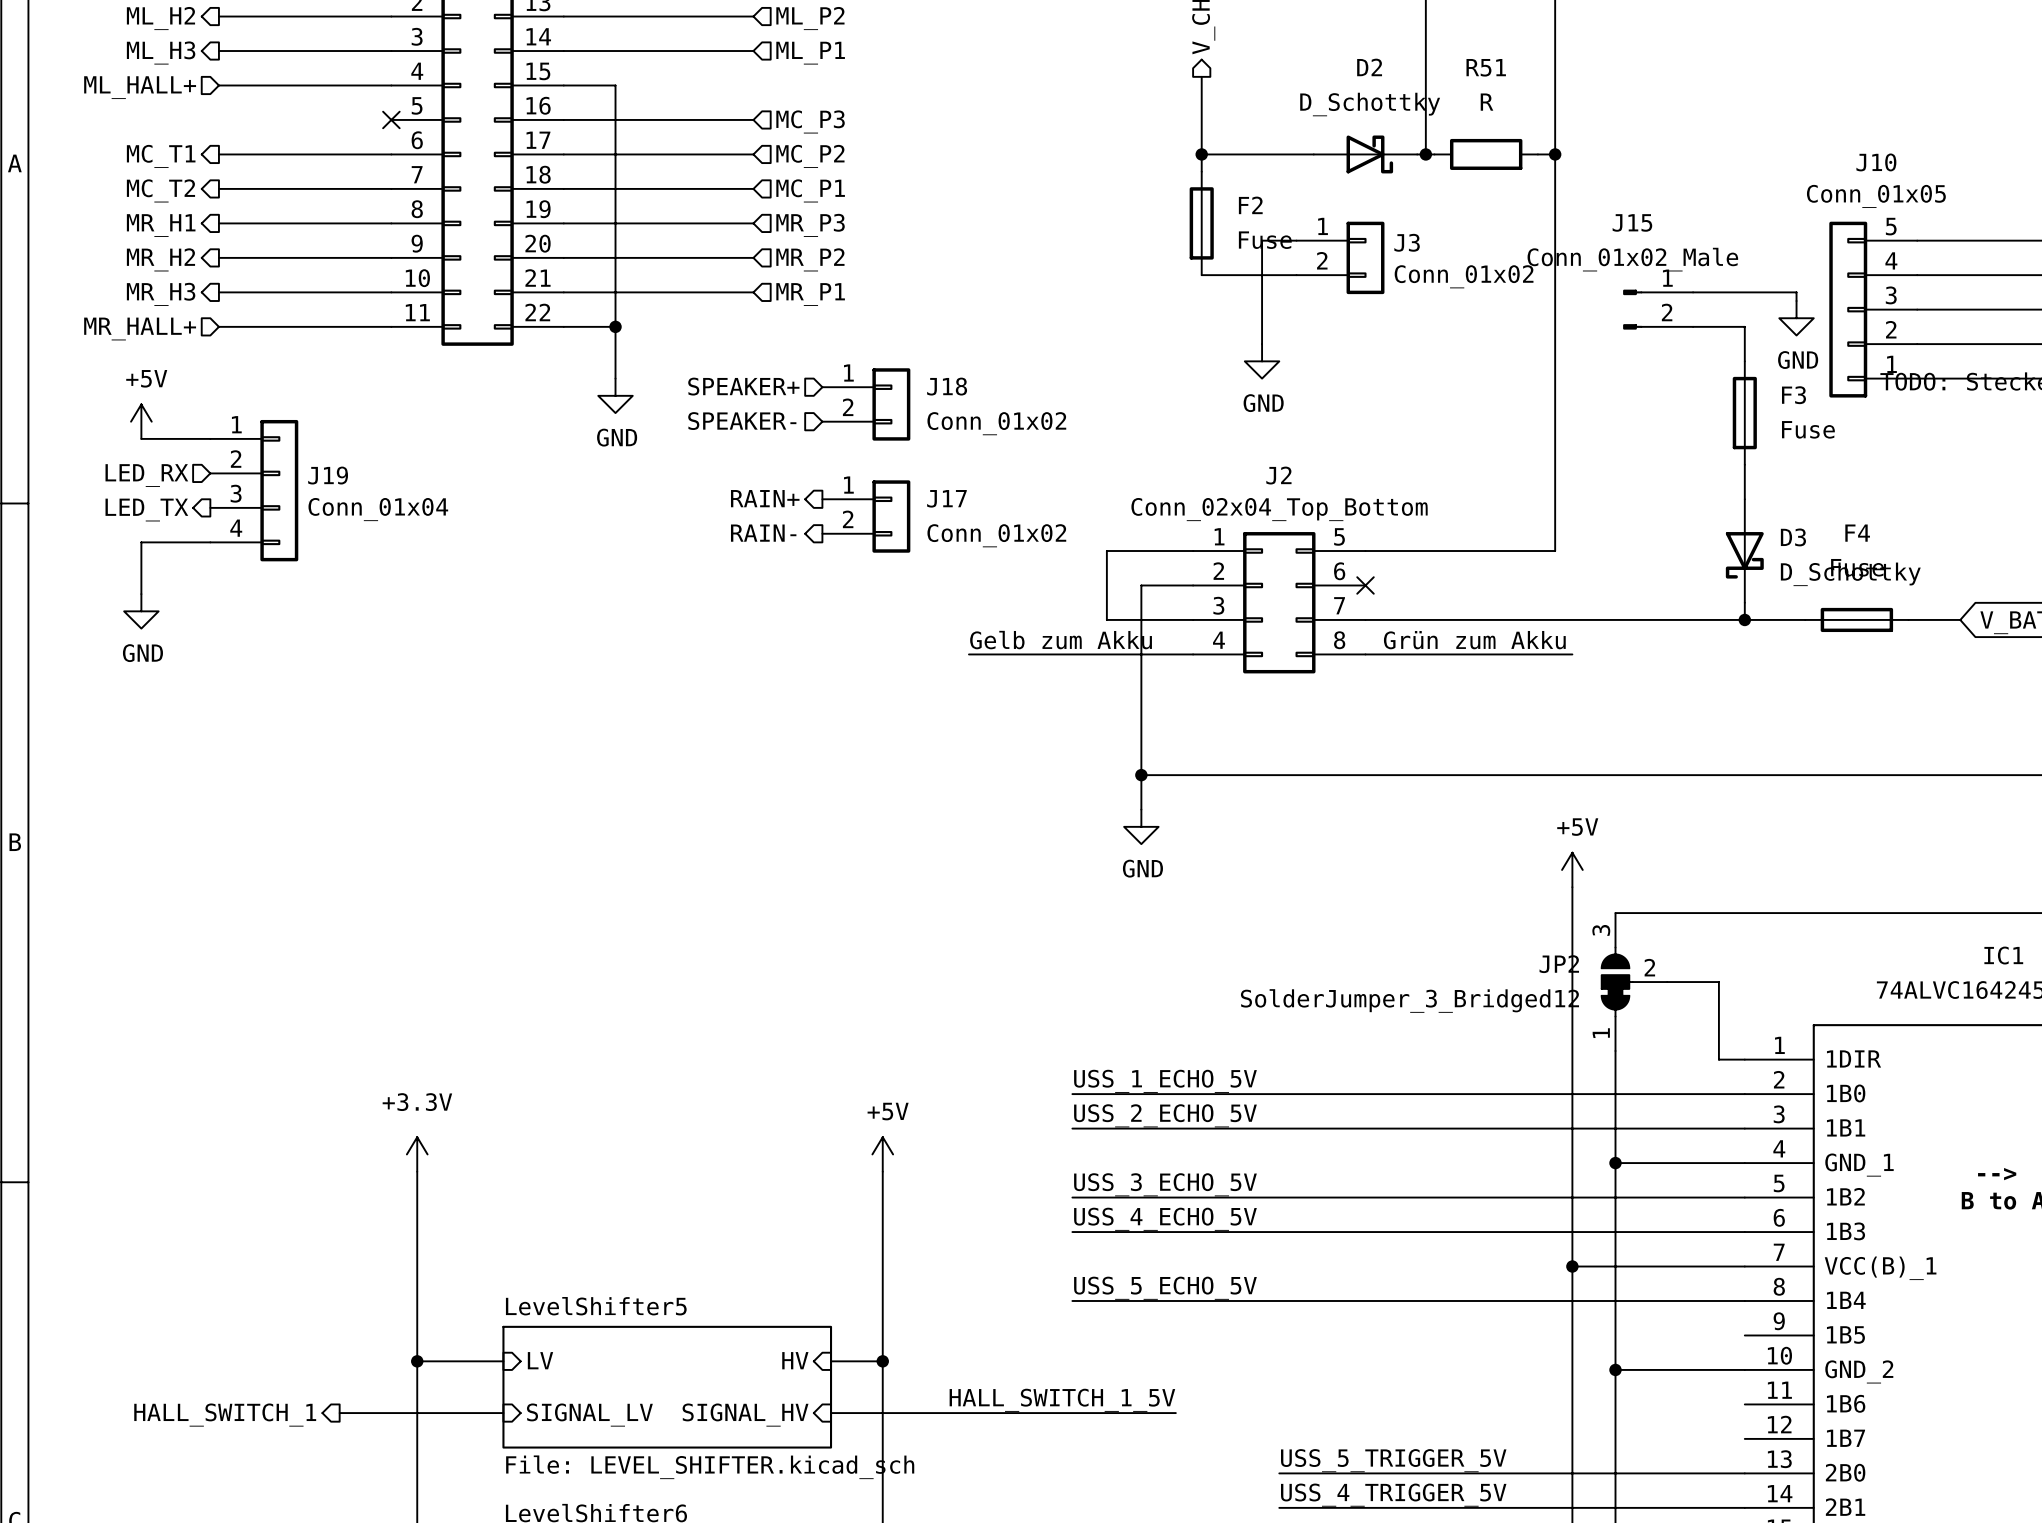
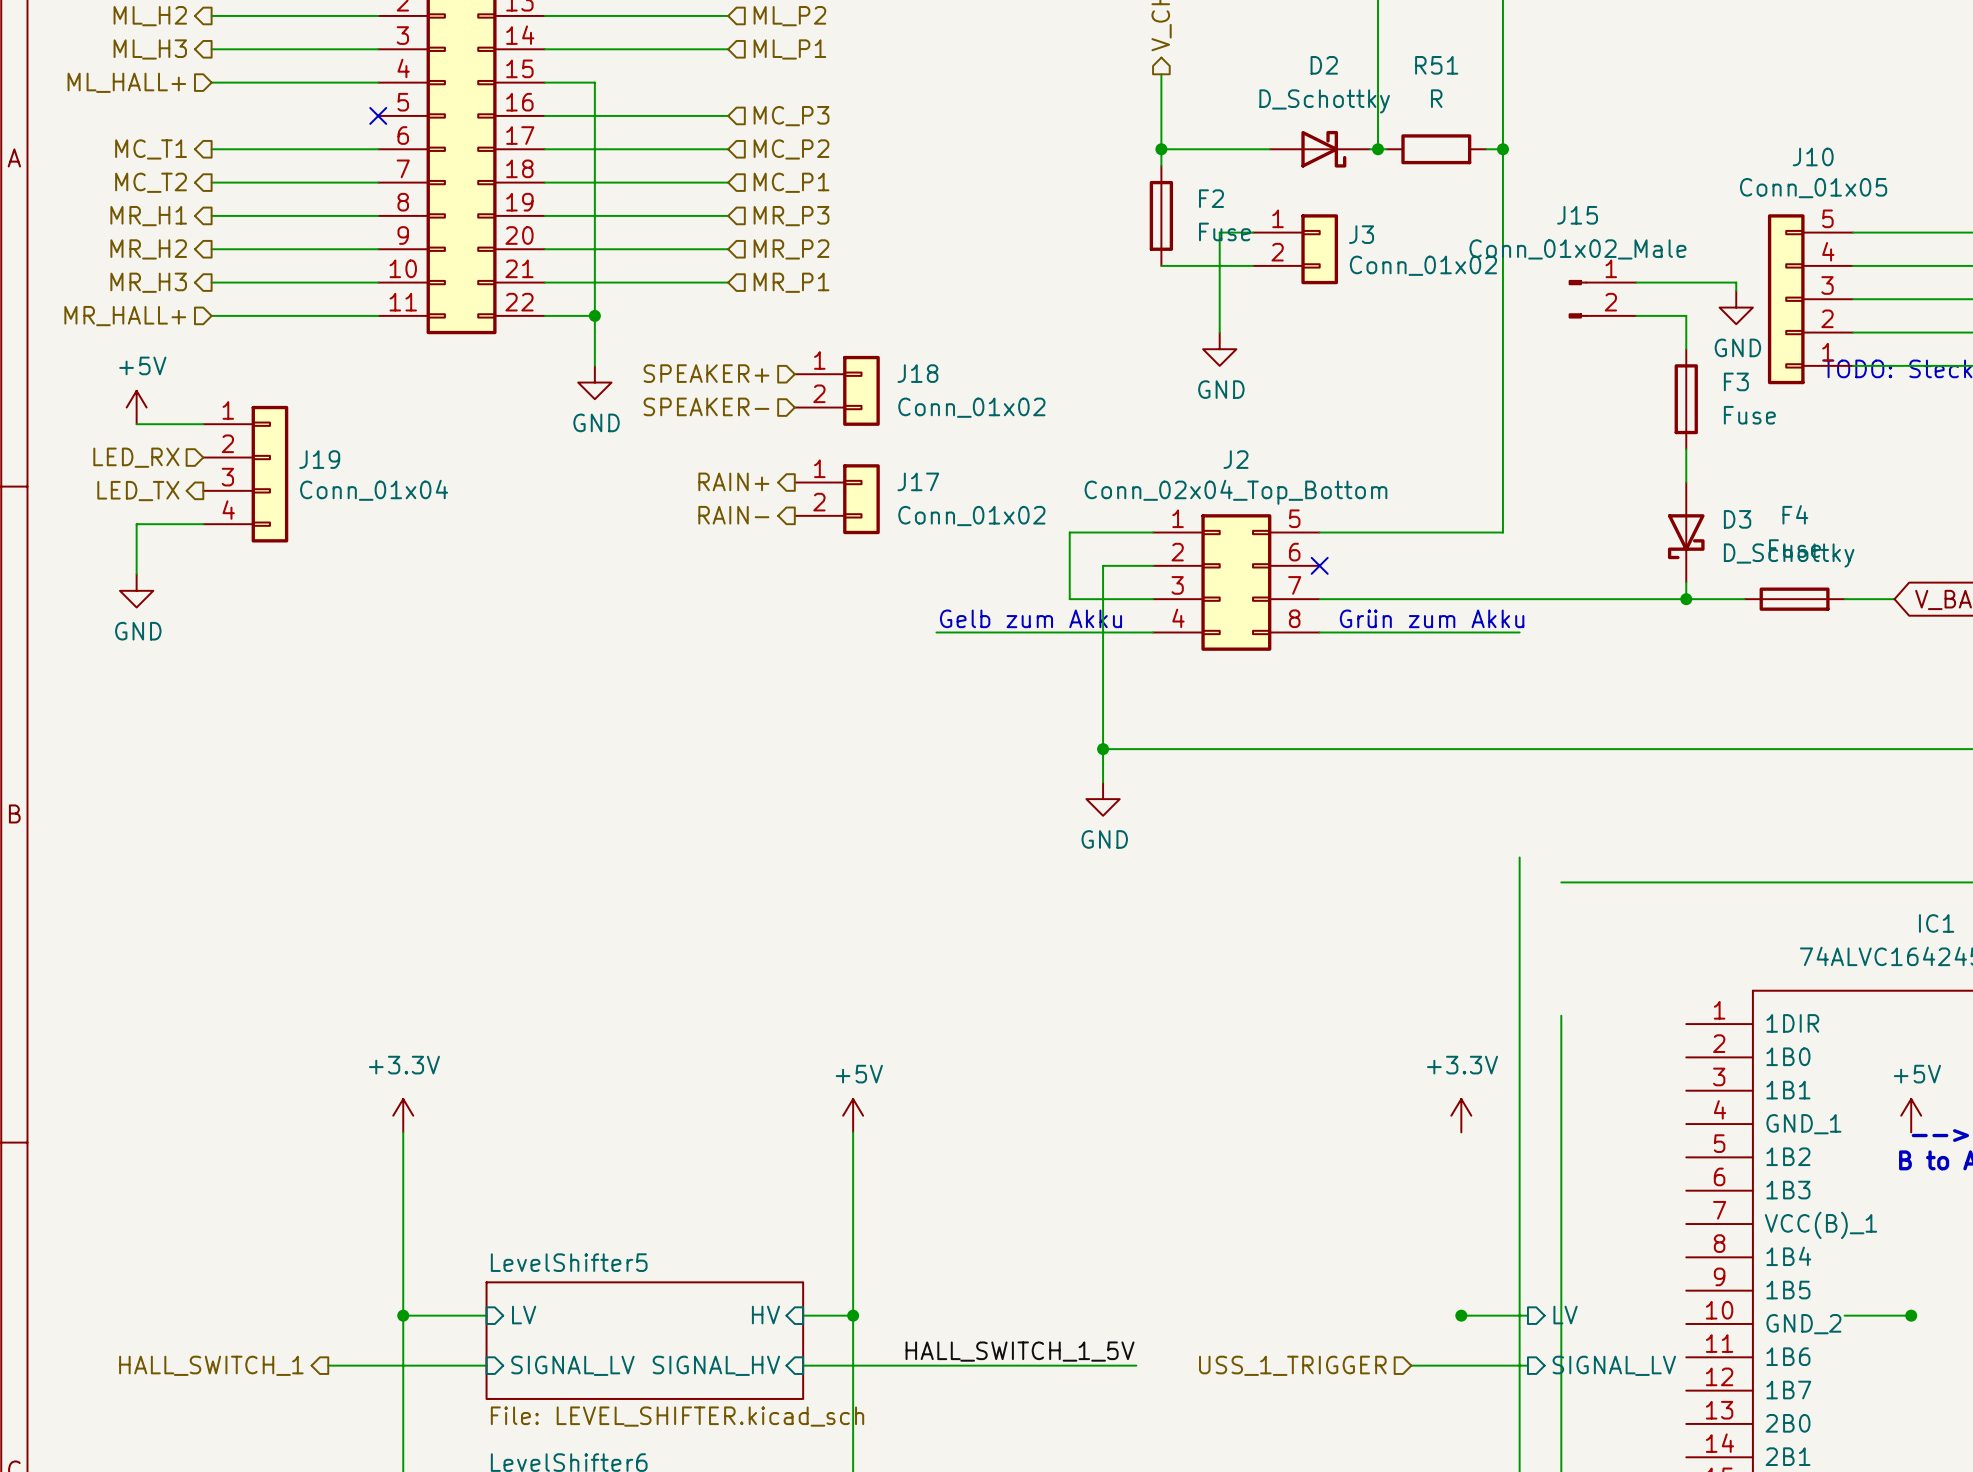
power symbol: +5V (1572, 869) -> none
JP2: SolderJumper_3_Bridged12 (1634, 982) -> none
wire: (1667, 982) (1718, 982) (1718, 1059) (1744, 1059) -> none
label: USS_1_ECHO_5V (1165, 1081) -> none
wire: (1072, 1094) (1744, 1094) -> none
label: USS_2_ECHO_5V (1165, 1115) -> none
wire: (1072, 1128) (1744, 1128) -> none
power symbol: none -> +3.3V (1461, 1115)
power symbol: none -> +5V (1911, 1115)
wire: (1615, 1163) (1744, 1163) -> none
junction: (1615, 1163) -> none
label: USS_3_ECHO_5V (1165, 1184) -> none
wire: (1072, 1197) (1744, 1197) -> none
label: USS_4_ECHO_5V (1165, 1219) -> none
wire: (1072, 1232) (1744, 1232) -> none
wire: (1572, 1266) (1744, 1266) -> none
junction: (1572, 1266) -> none
label: USS_5_ECHO_5V (1165, 1288) -> none
wire: (1072, 1300) (1744, 1300) -> none
sheet pin: none -> LV (1565, 1315)
wire: none -> (1461, 1315) (1527, 1315)
junction: none -> (1461, 1315)
wire: none -> (1844, 1315) (1911, 1315)
junction: none -> (1911, 1315)
wire: (1615, 1369) (1744, 1369) -> none
junction: (1615, 1369) -> none
wire: none -> (1411, 1365) (1527, 1365)
hierarchical label: none -> USS_1_TRIGGER (1292, 1365)
sheet pin: none -> SIGNAL_LV (1614, 1365)
label: USS_5_TRIGGER_5V (1393, 1460) -> none
wire: (1279, 1473) (1744, 1473) -> none
label: USS_4_TRIGGER_5V (1393, 1495) -> none
wire: (1279, 1507) (1744, 1507) -> none

